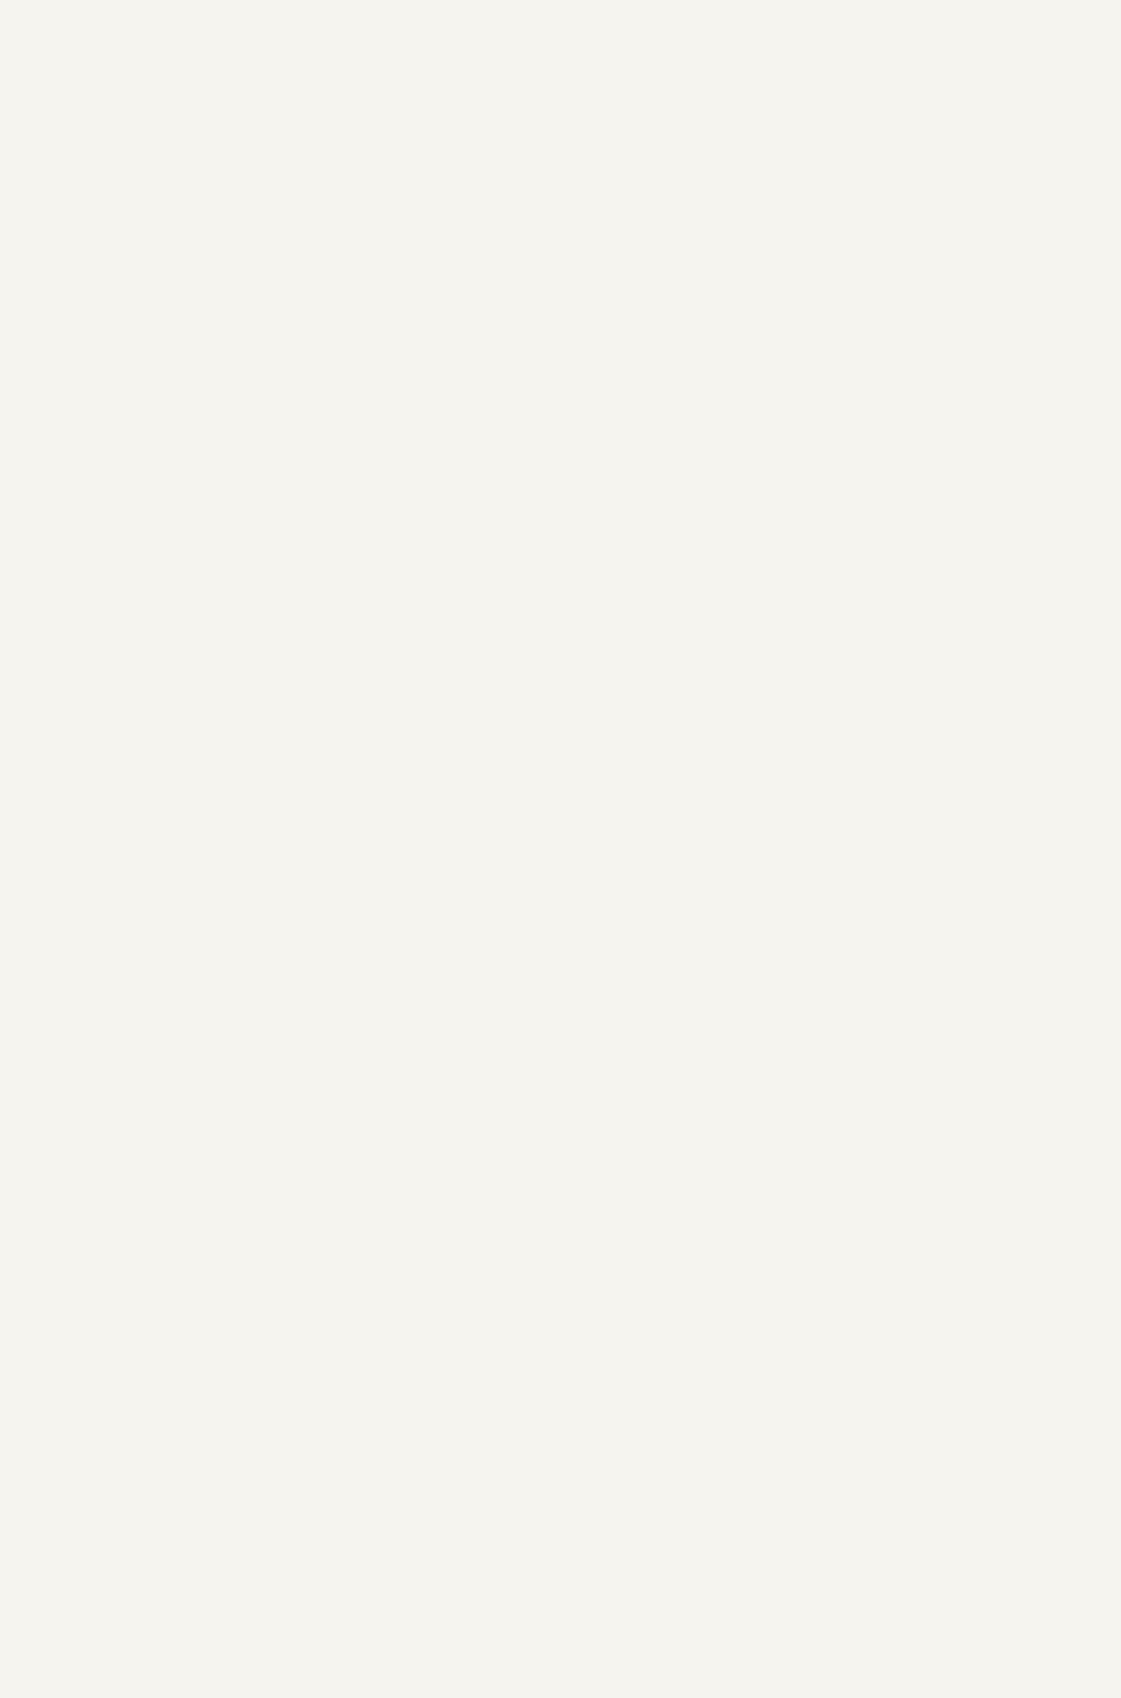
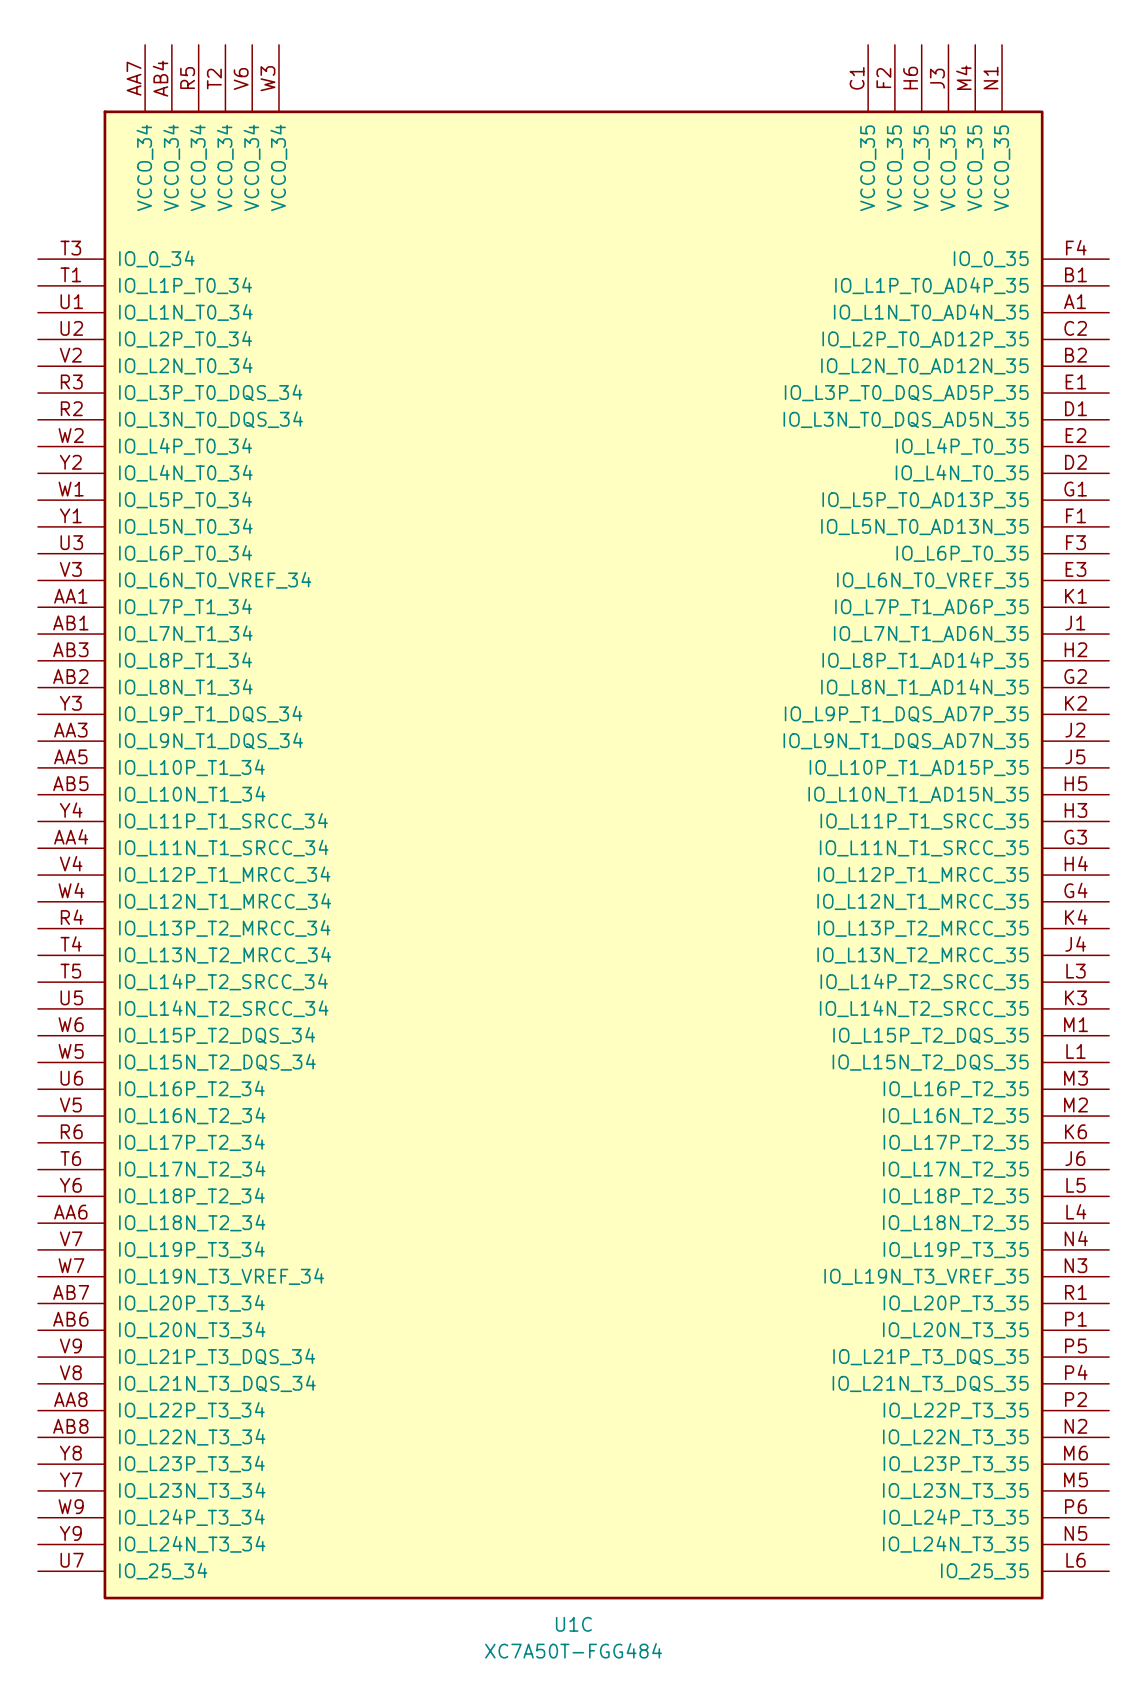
U1C: none -> XC7A50T-FGG484 (573, 822)

